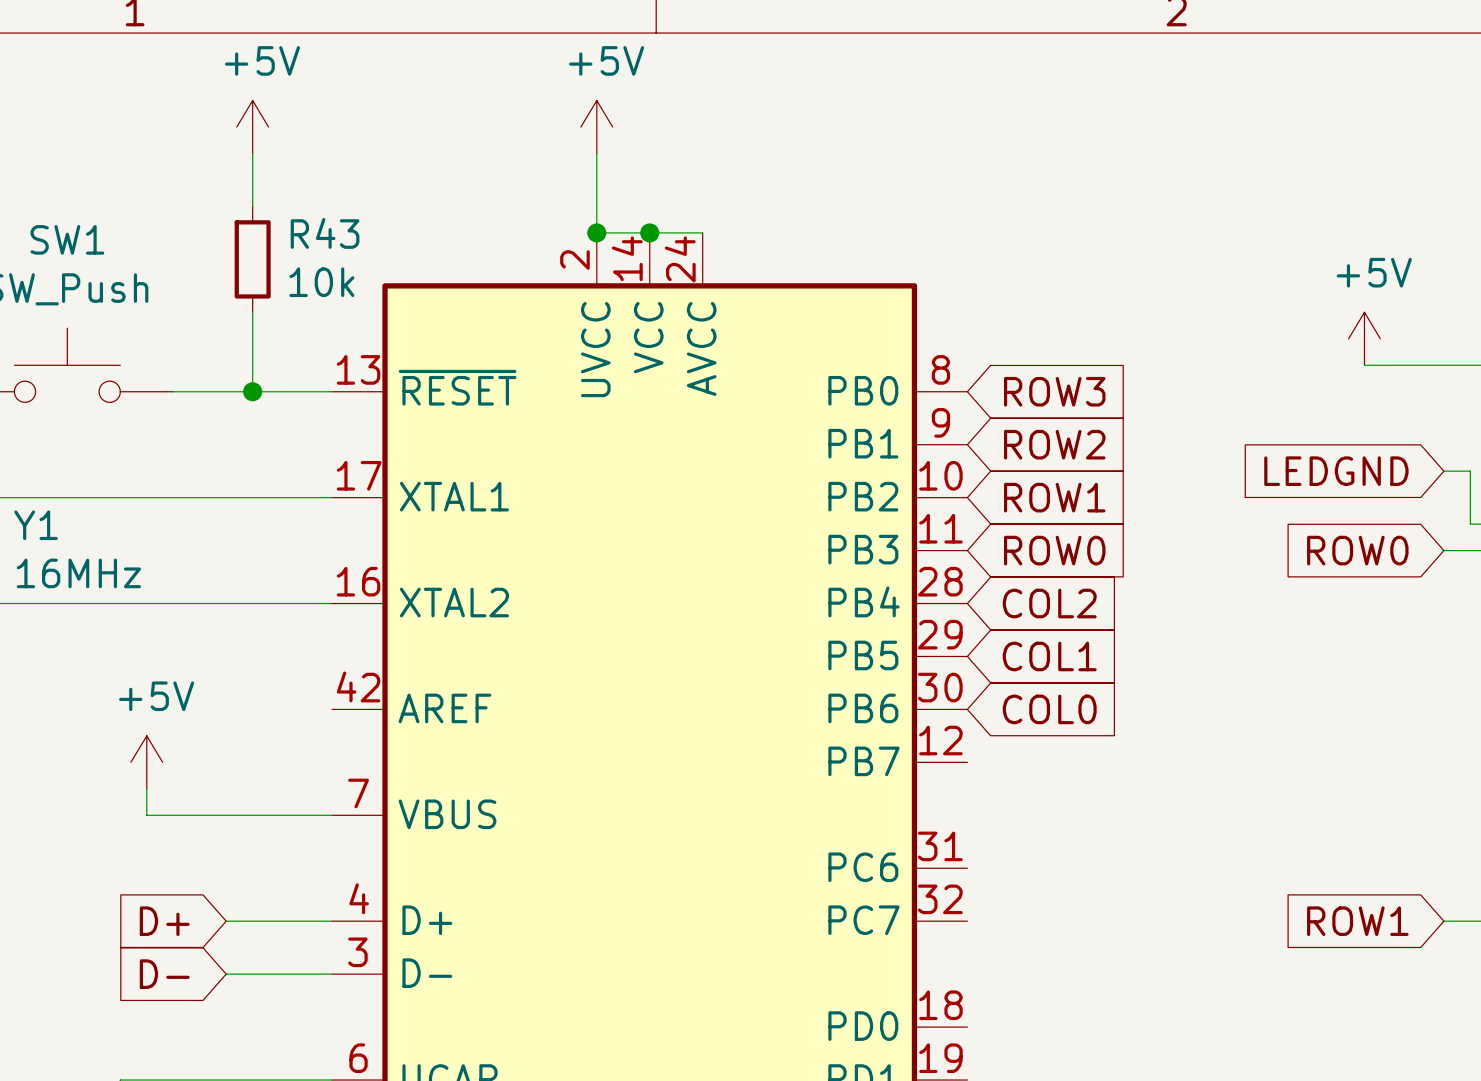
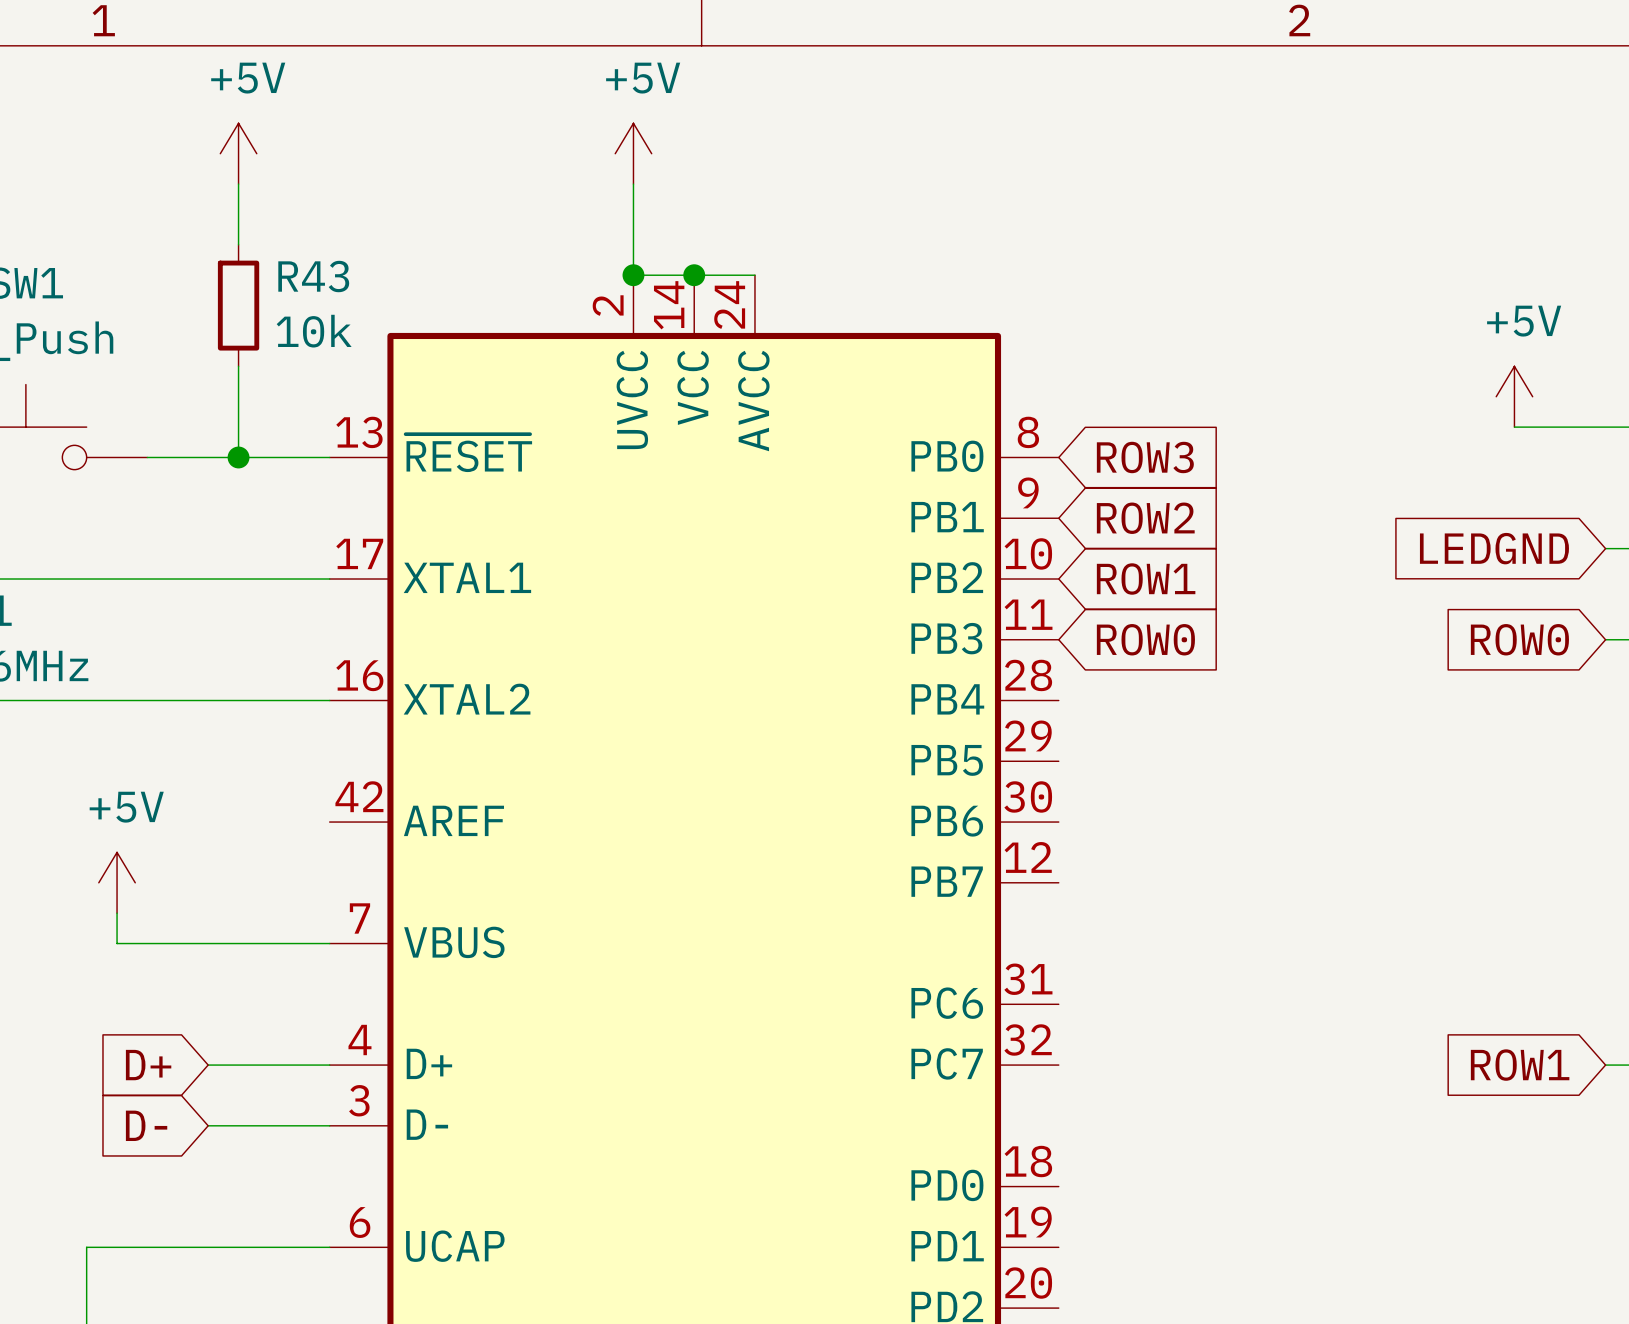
global label: COL2 (1049, 603) -> none
global label: COL1 (1049, 656) -> none
global label: COL0 (1049, 709) -> none

